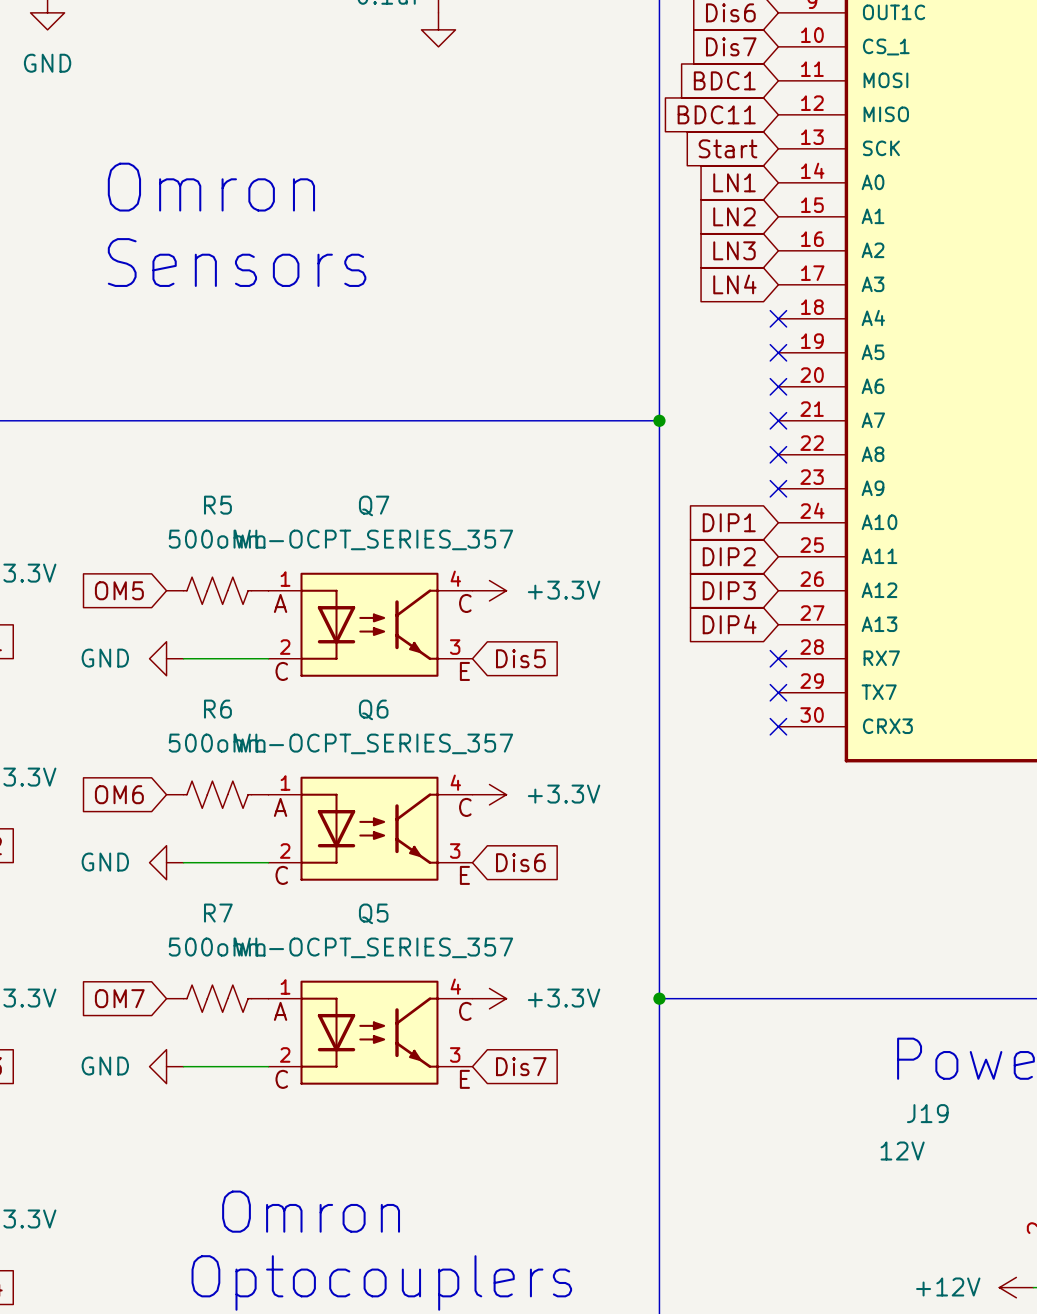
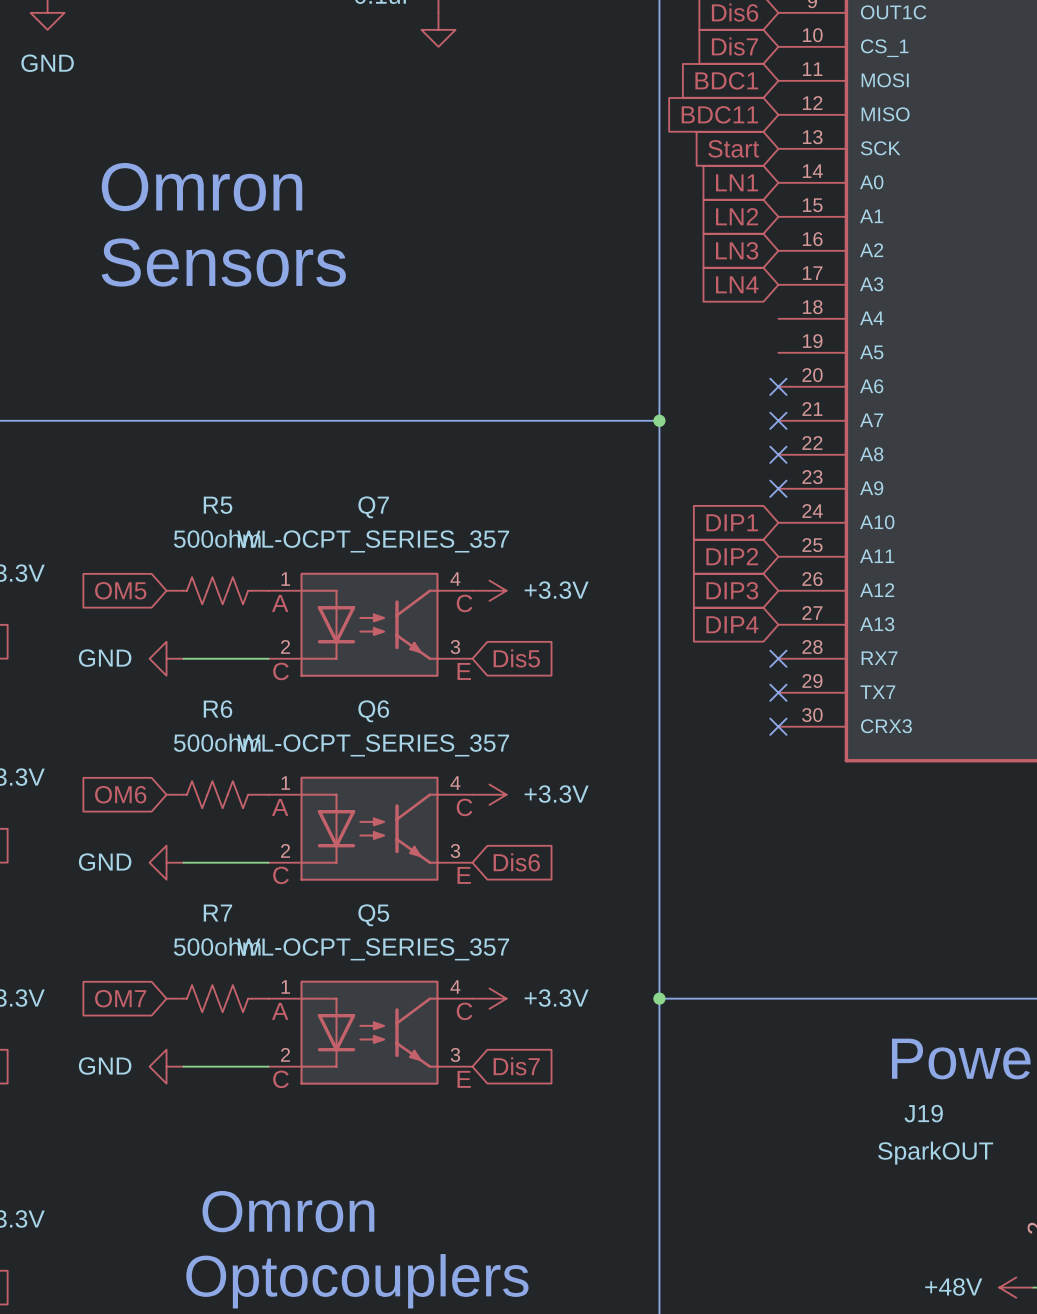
no-connect mark: (778, 318) -> none
no-connect mark: (778, 352) -> none
J19 value: 12V (902, 1151) -> SparkOUT (935, 1153)
power symbol: +12V (1016, 1287) -> +48V (1016, 1287)

